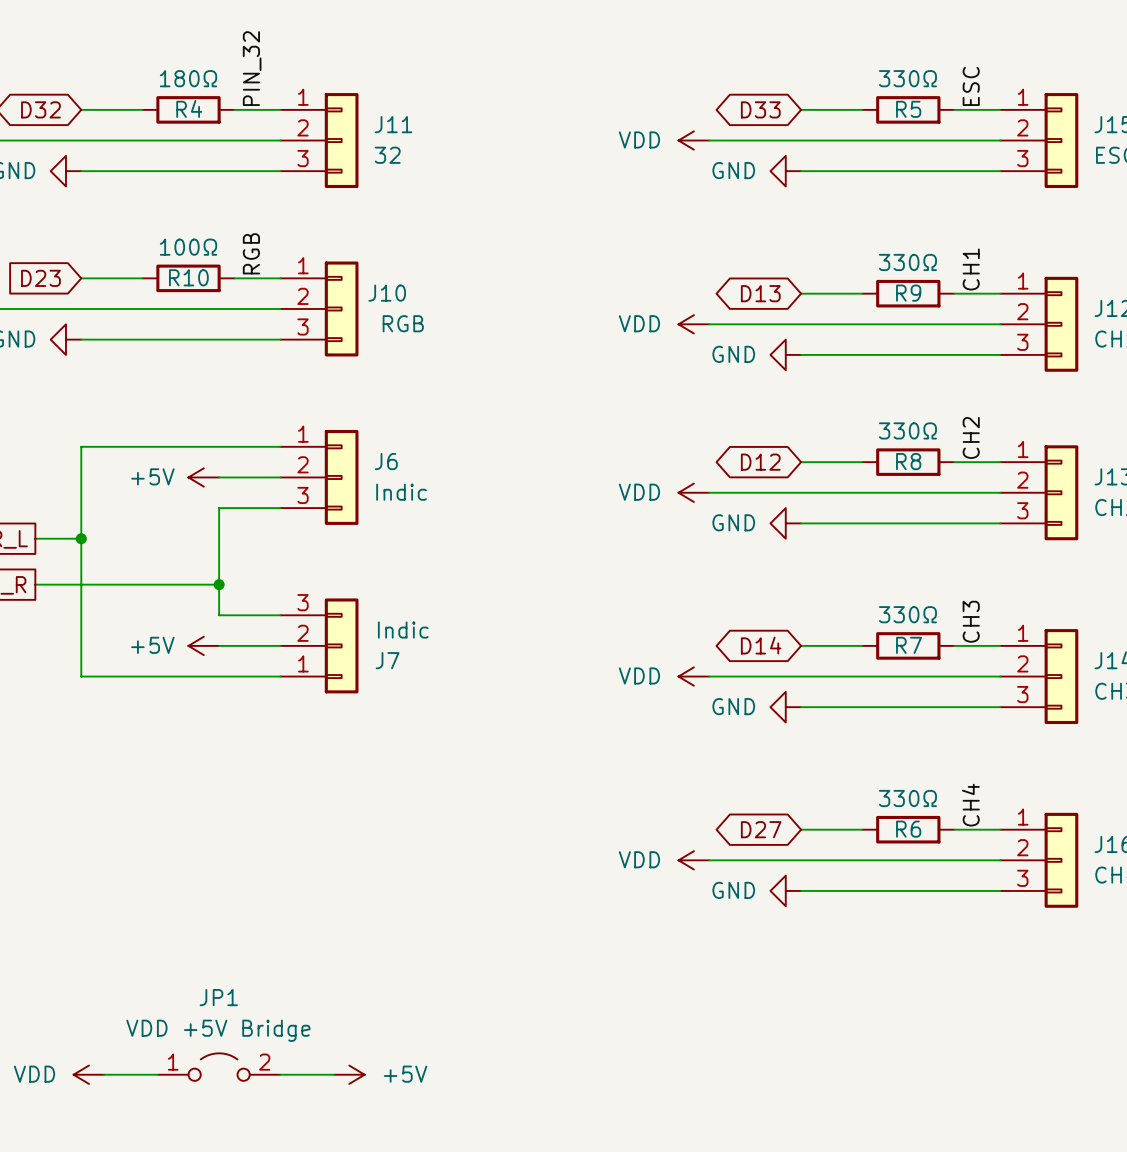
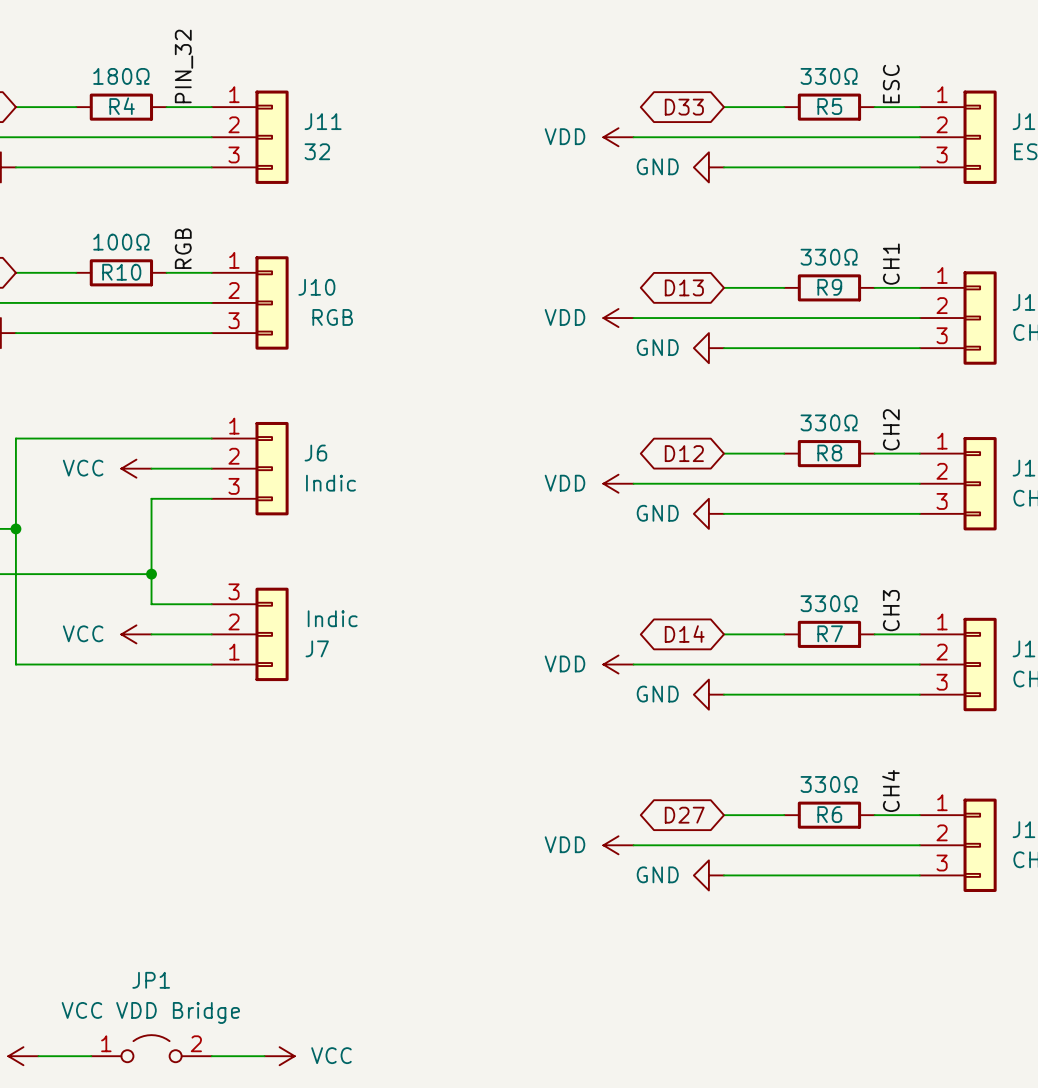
power symbol: +5V (203, 477) -> VCC (136, 468)
power symbol: +5V (203, 645) -> VCC (136, 634)
JP1 value: VDD +5V Bridge (218, 1030) -> VCC VDD Bridge (150, 1012)
power symbol: +5V (349, 1074) -> VCC (279, 1056)

